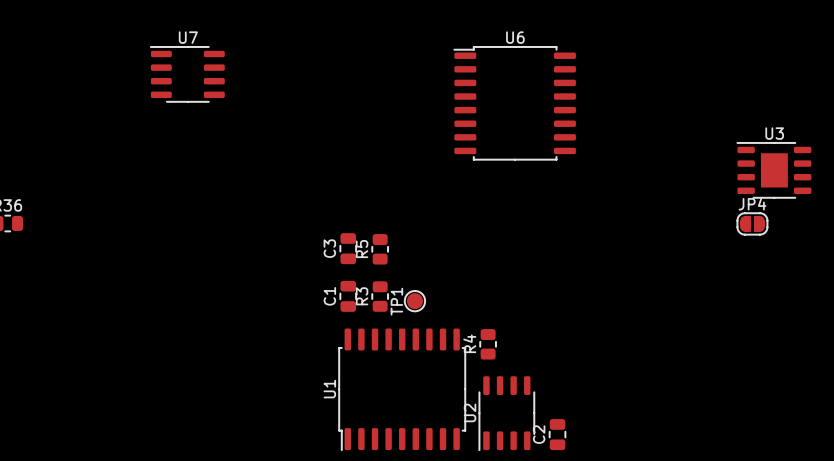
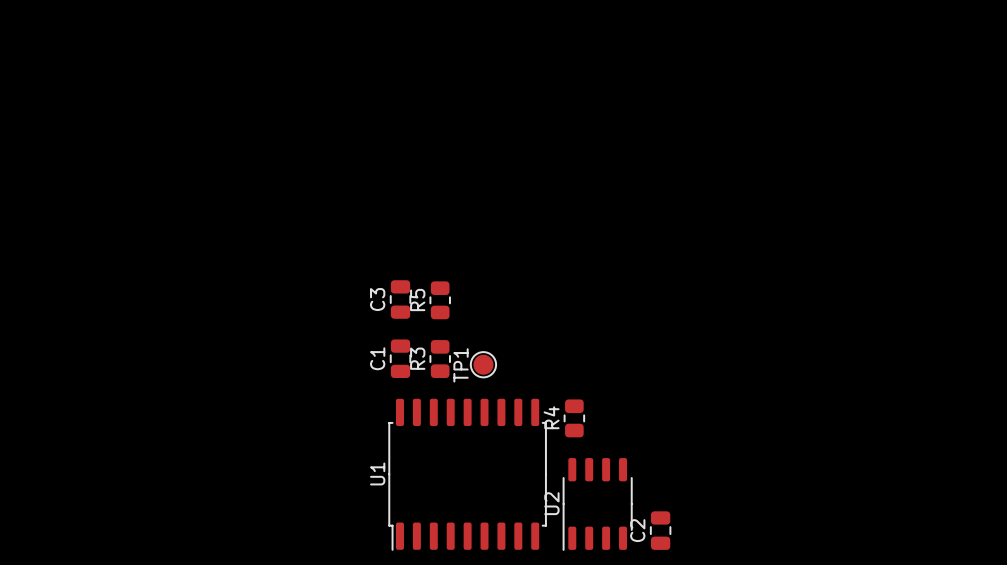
U7: (187, 74) -> none
U6: (514, 103) -> none
U3: (774, 170) -> none
JP4: (752, 223) -> none

